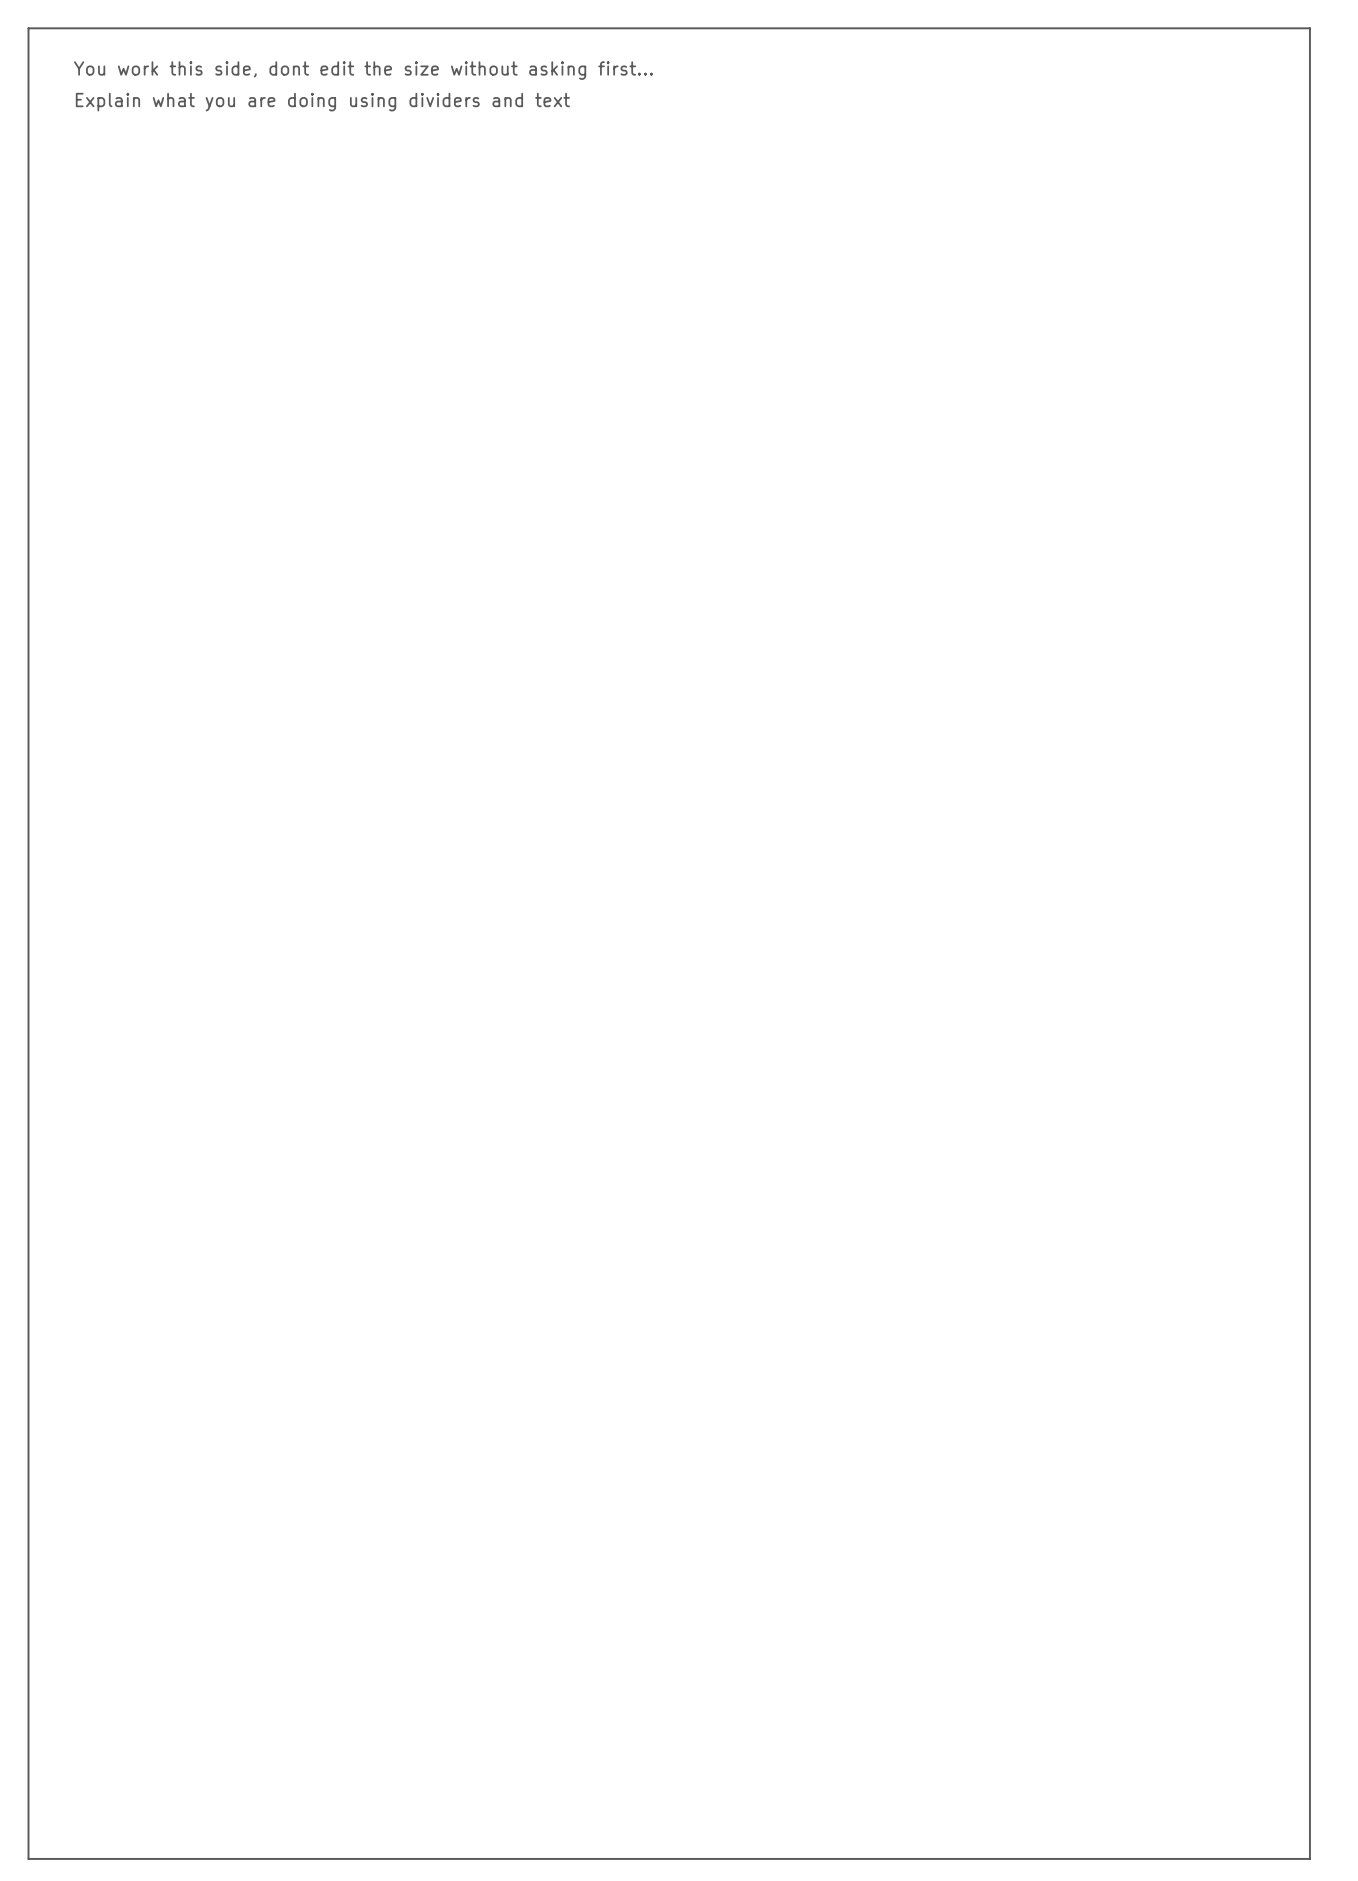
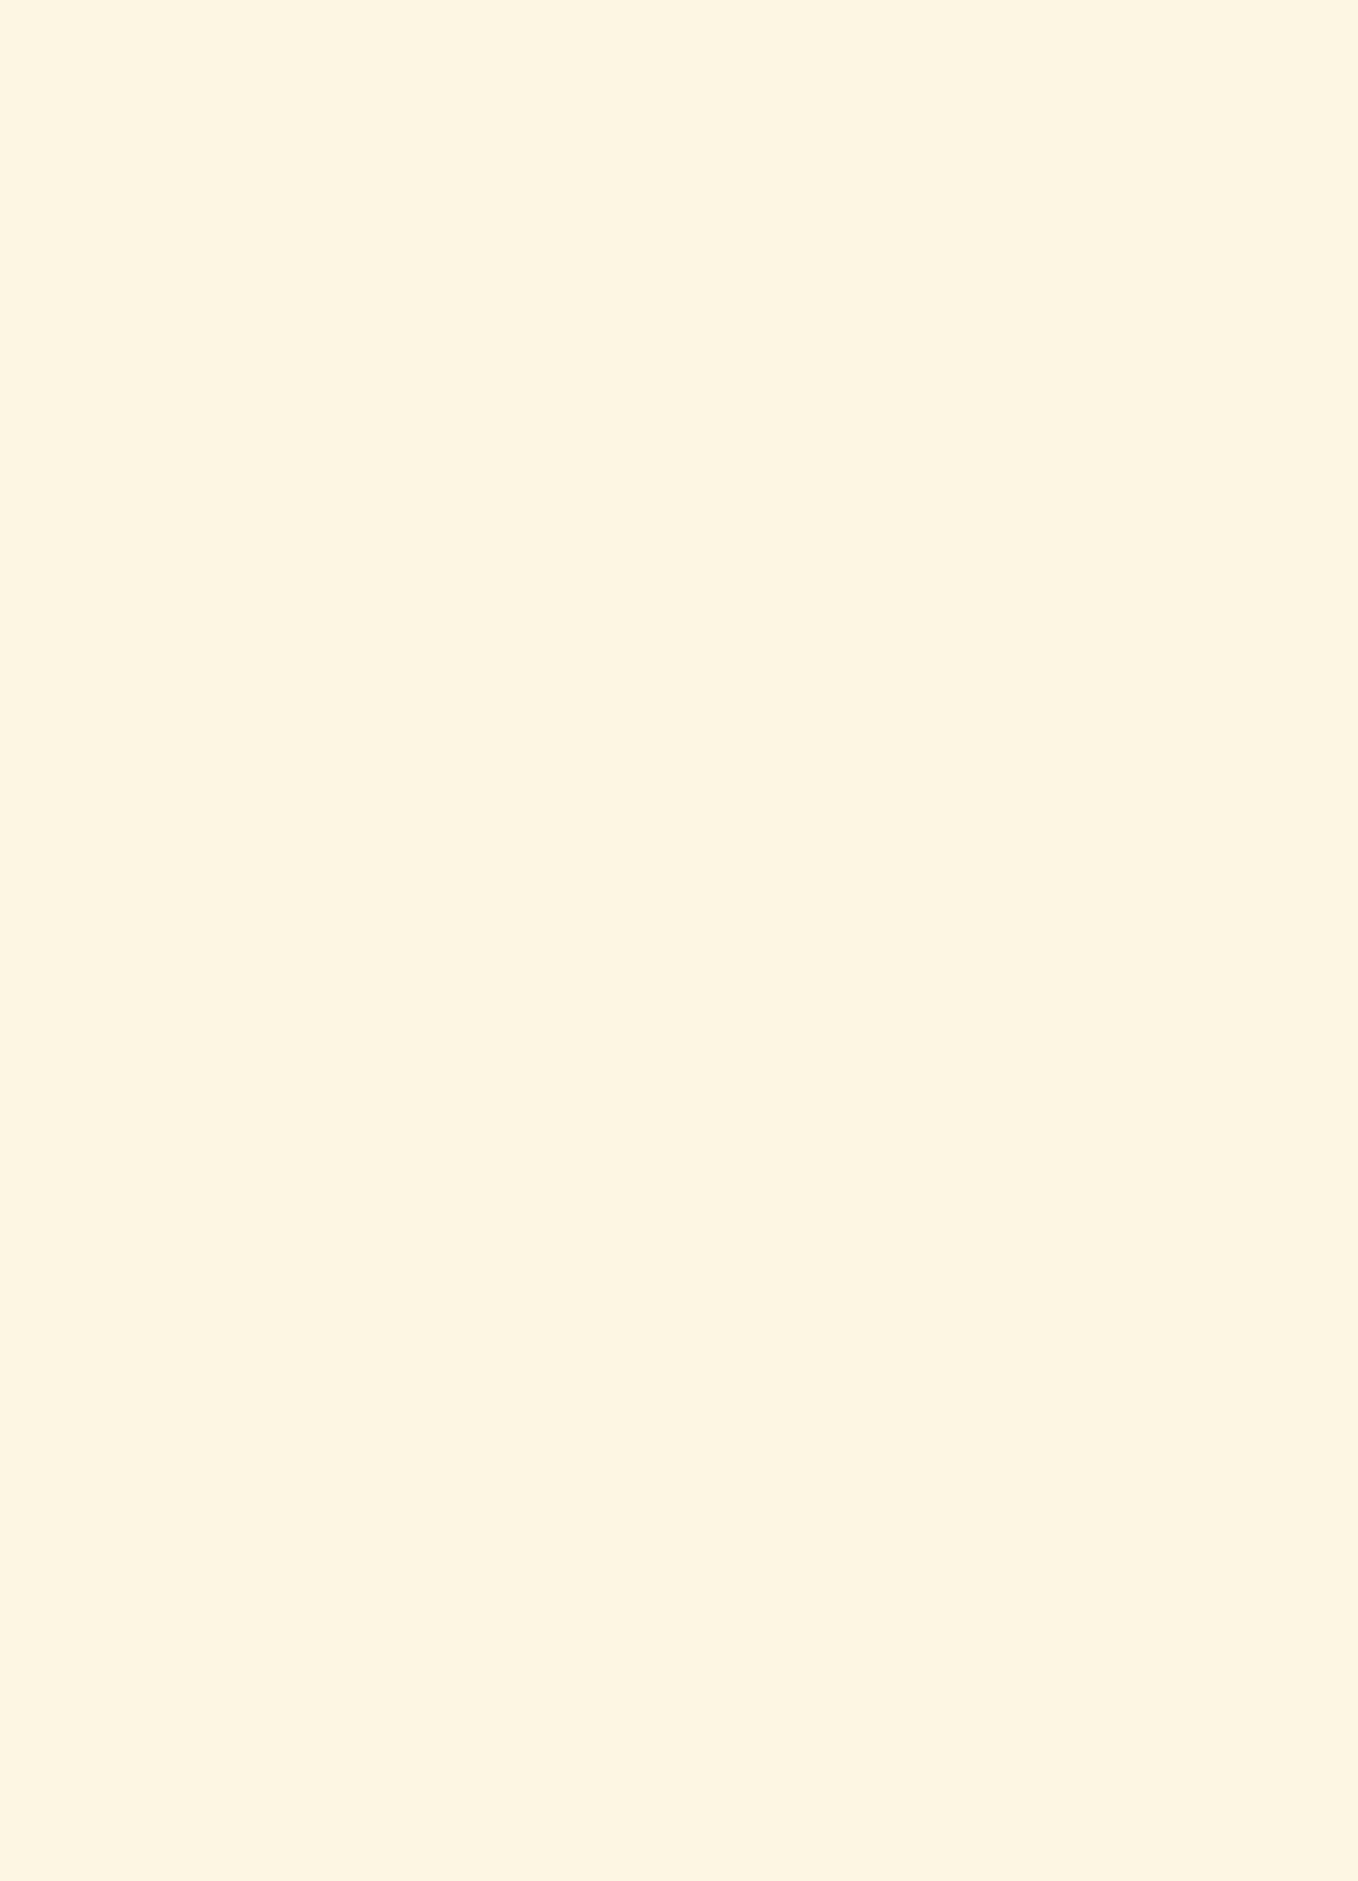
line: (28, 28) (1309, 28) (1309, 1858) (28, 1858) (28, 28) -> none
text: You work this side, dont edit the size without asking first... (363, 70) -> none
text: Explain what you are doing using dividers and text (322, 102) -> none

